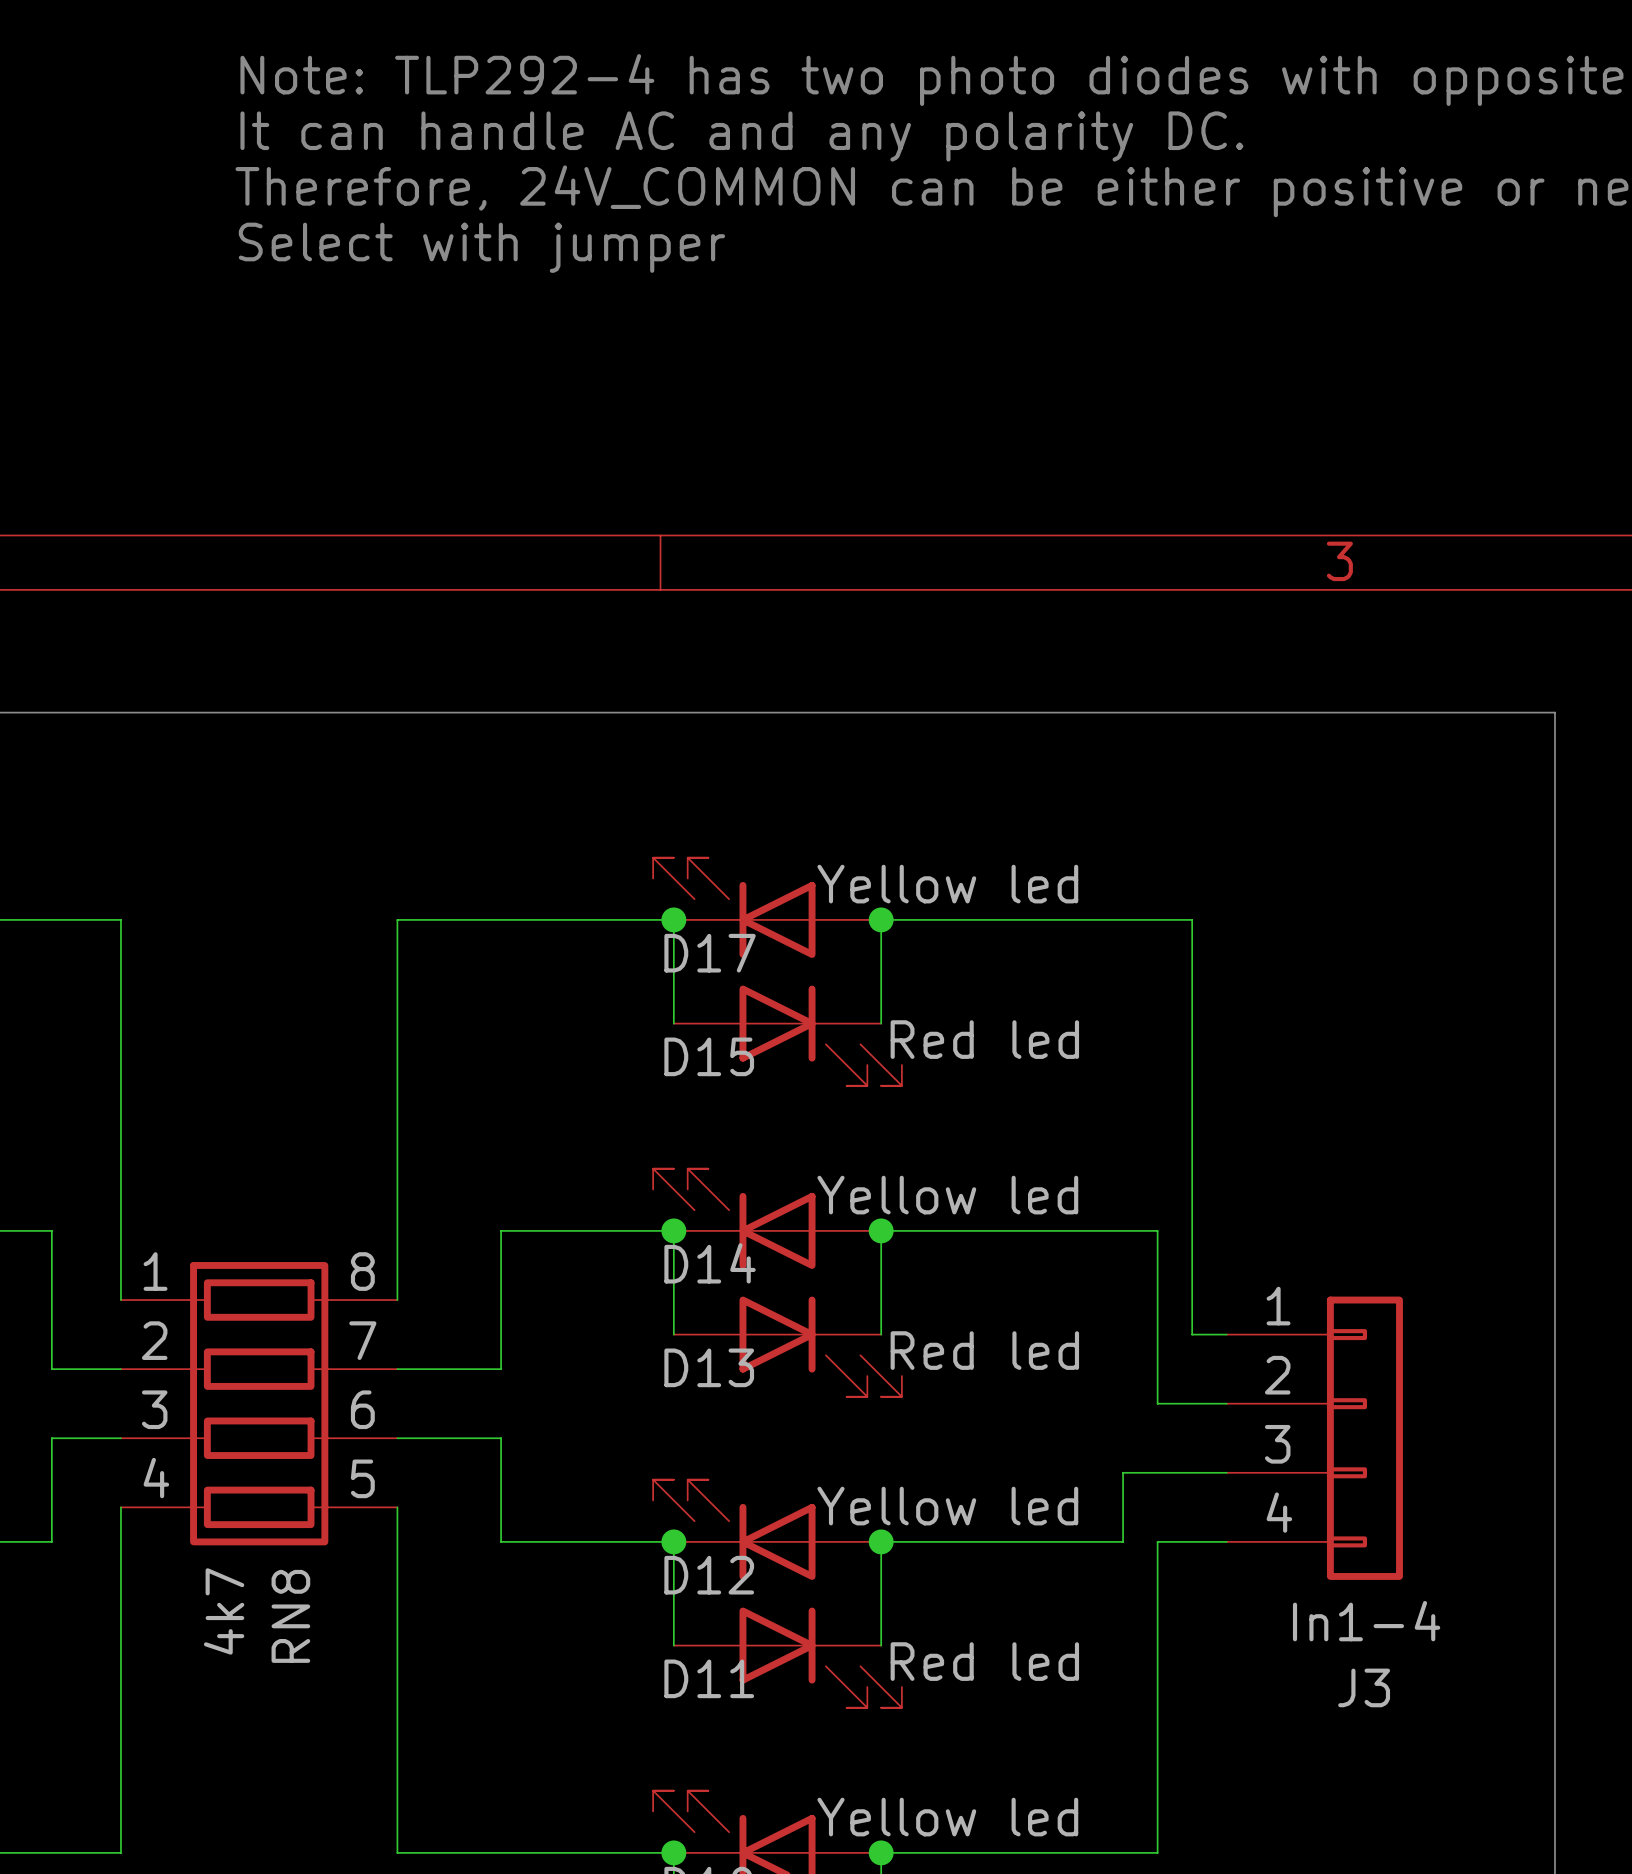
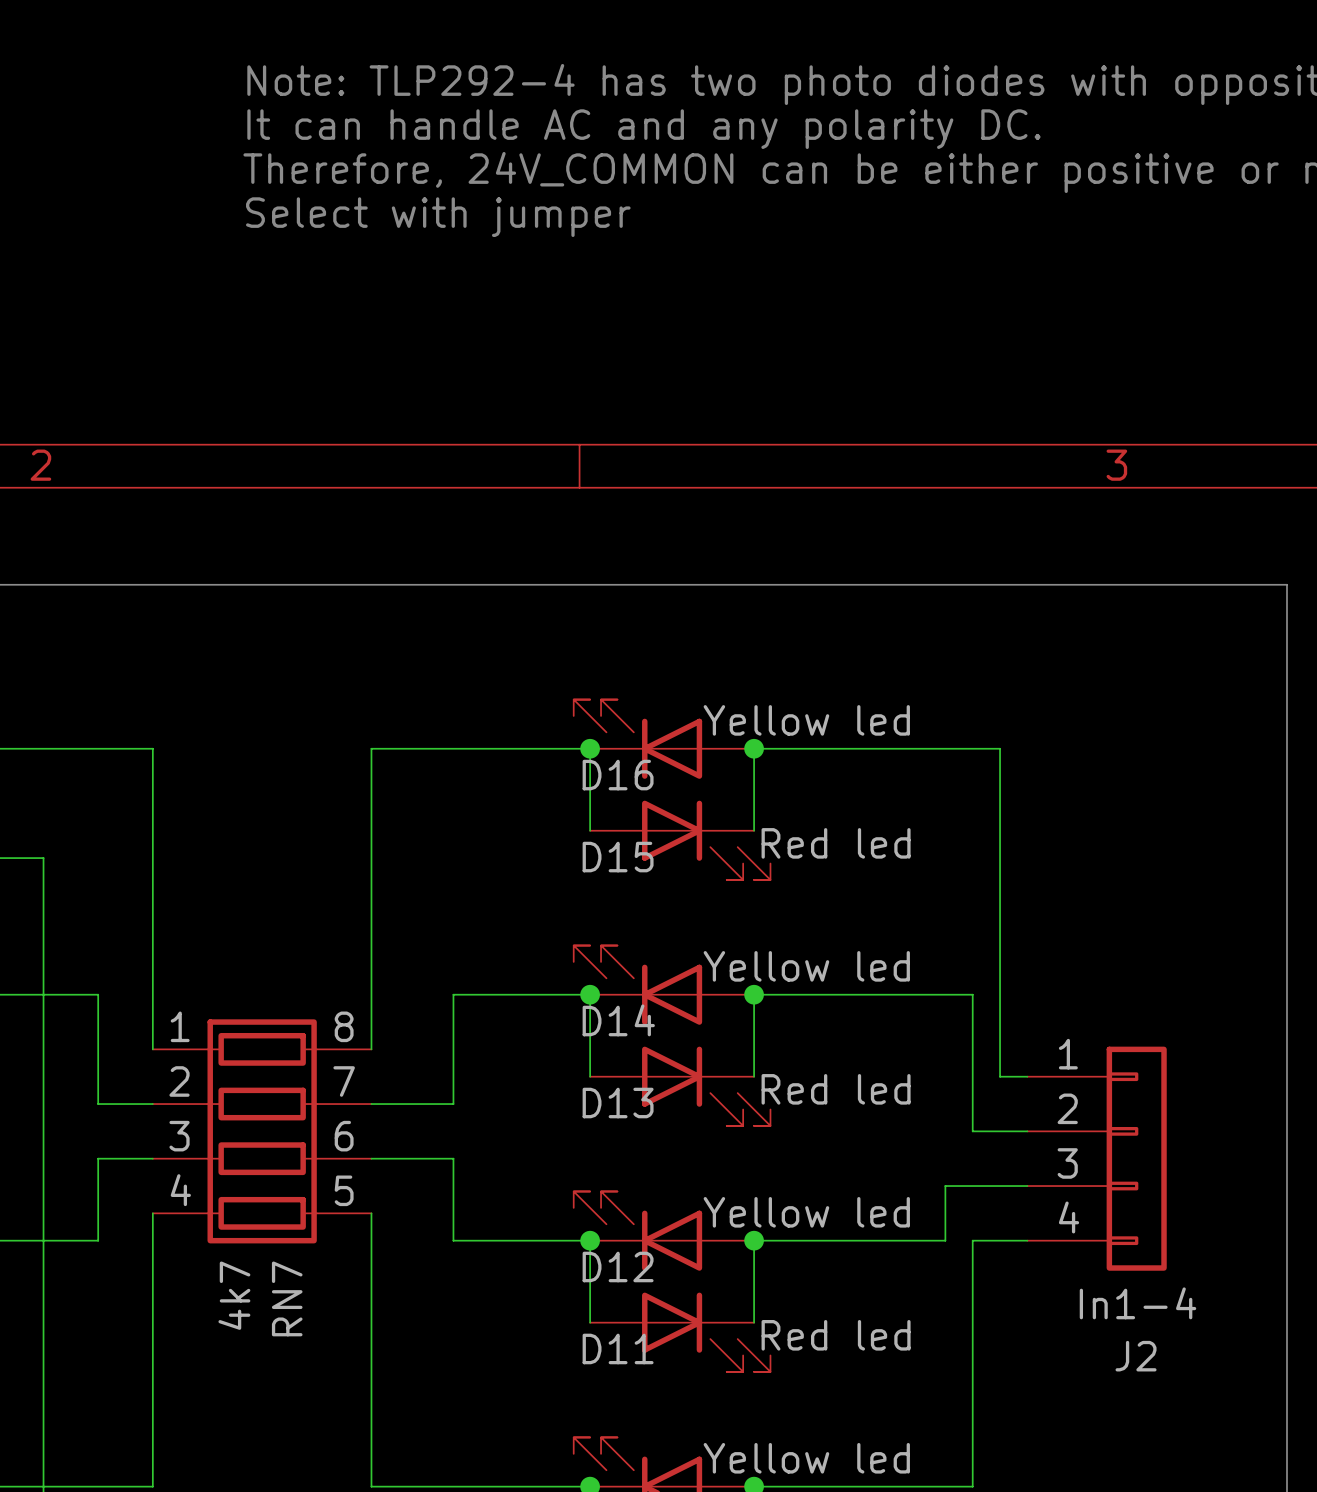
D17 name: D17 (710, 953) -> D16 (618, 775)
RN8 name: RN8 (290, 1616) -> RN7 (287, 1298)
J3 name: J3 (1364, 1687) -> J2 (1136, 1356)

